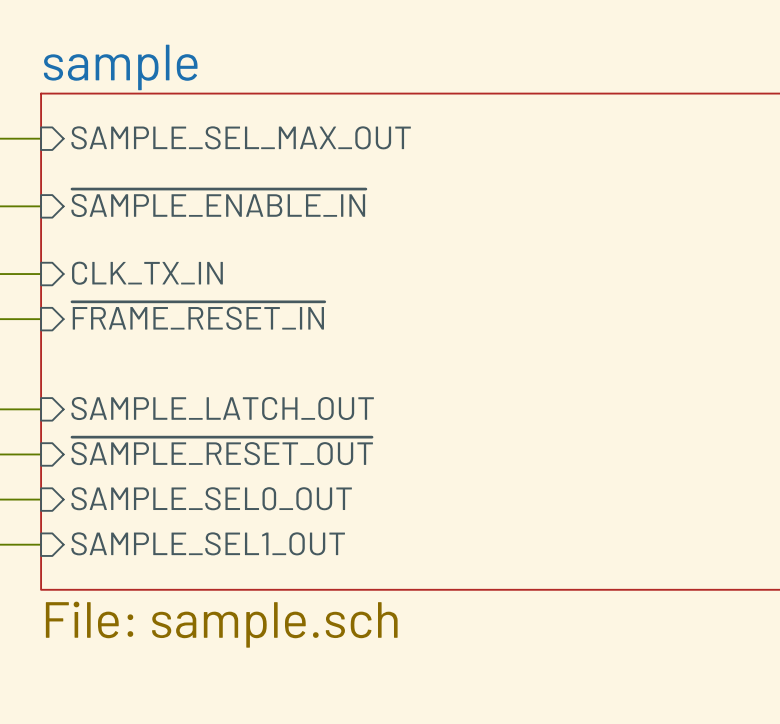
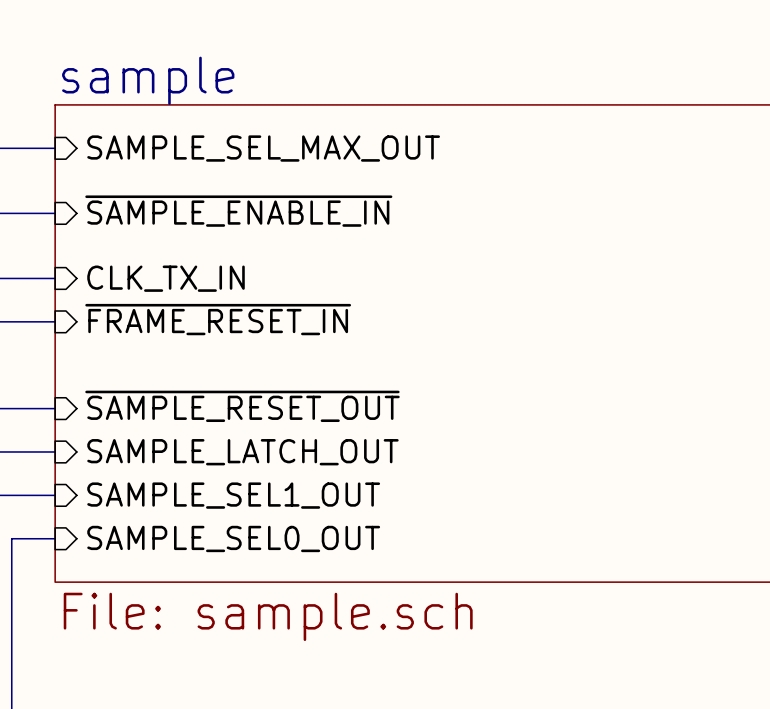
sheet pin: SAMPLE_LATCH_OUT (222, 408) -> ~{SAMPLE_RESET_OUT} (242, 406)
sheet pin: ~{SAMPLE_RESET_OUT} (222, 451) -> SAMPLE_LATCH_OUT (242, 452)
sheet pin: SAMPLE_SEL0_OUT (211, 498) -> SAMPLE_SEL1_OUT (233, 495)
sheet pin: SAMPLE_SEL1_OUT (208, 543) -> SAMPLE_SEL0_OUT (233, 538)

